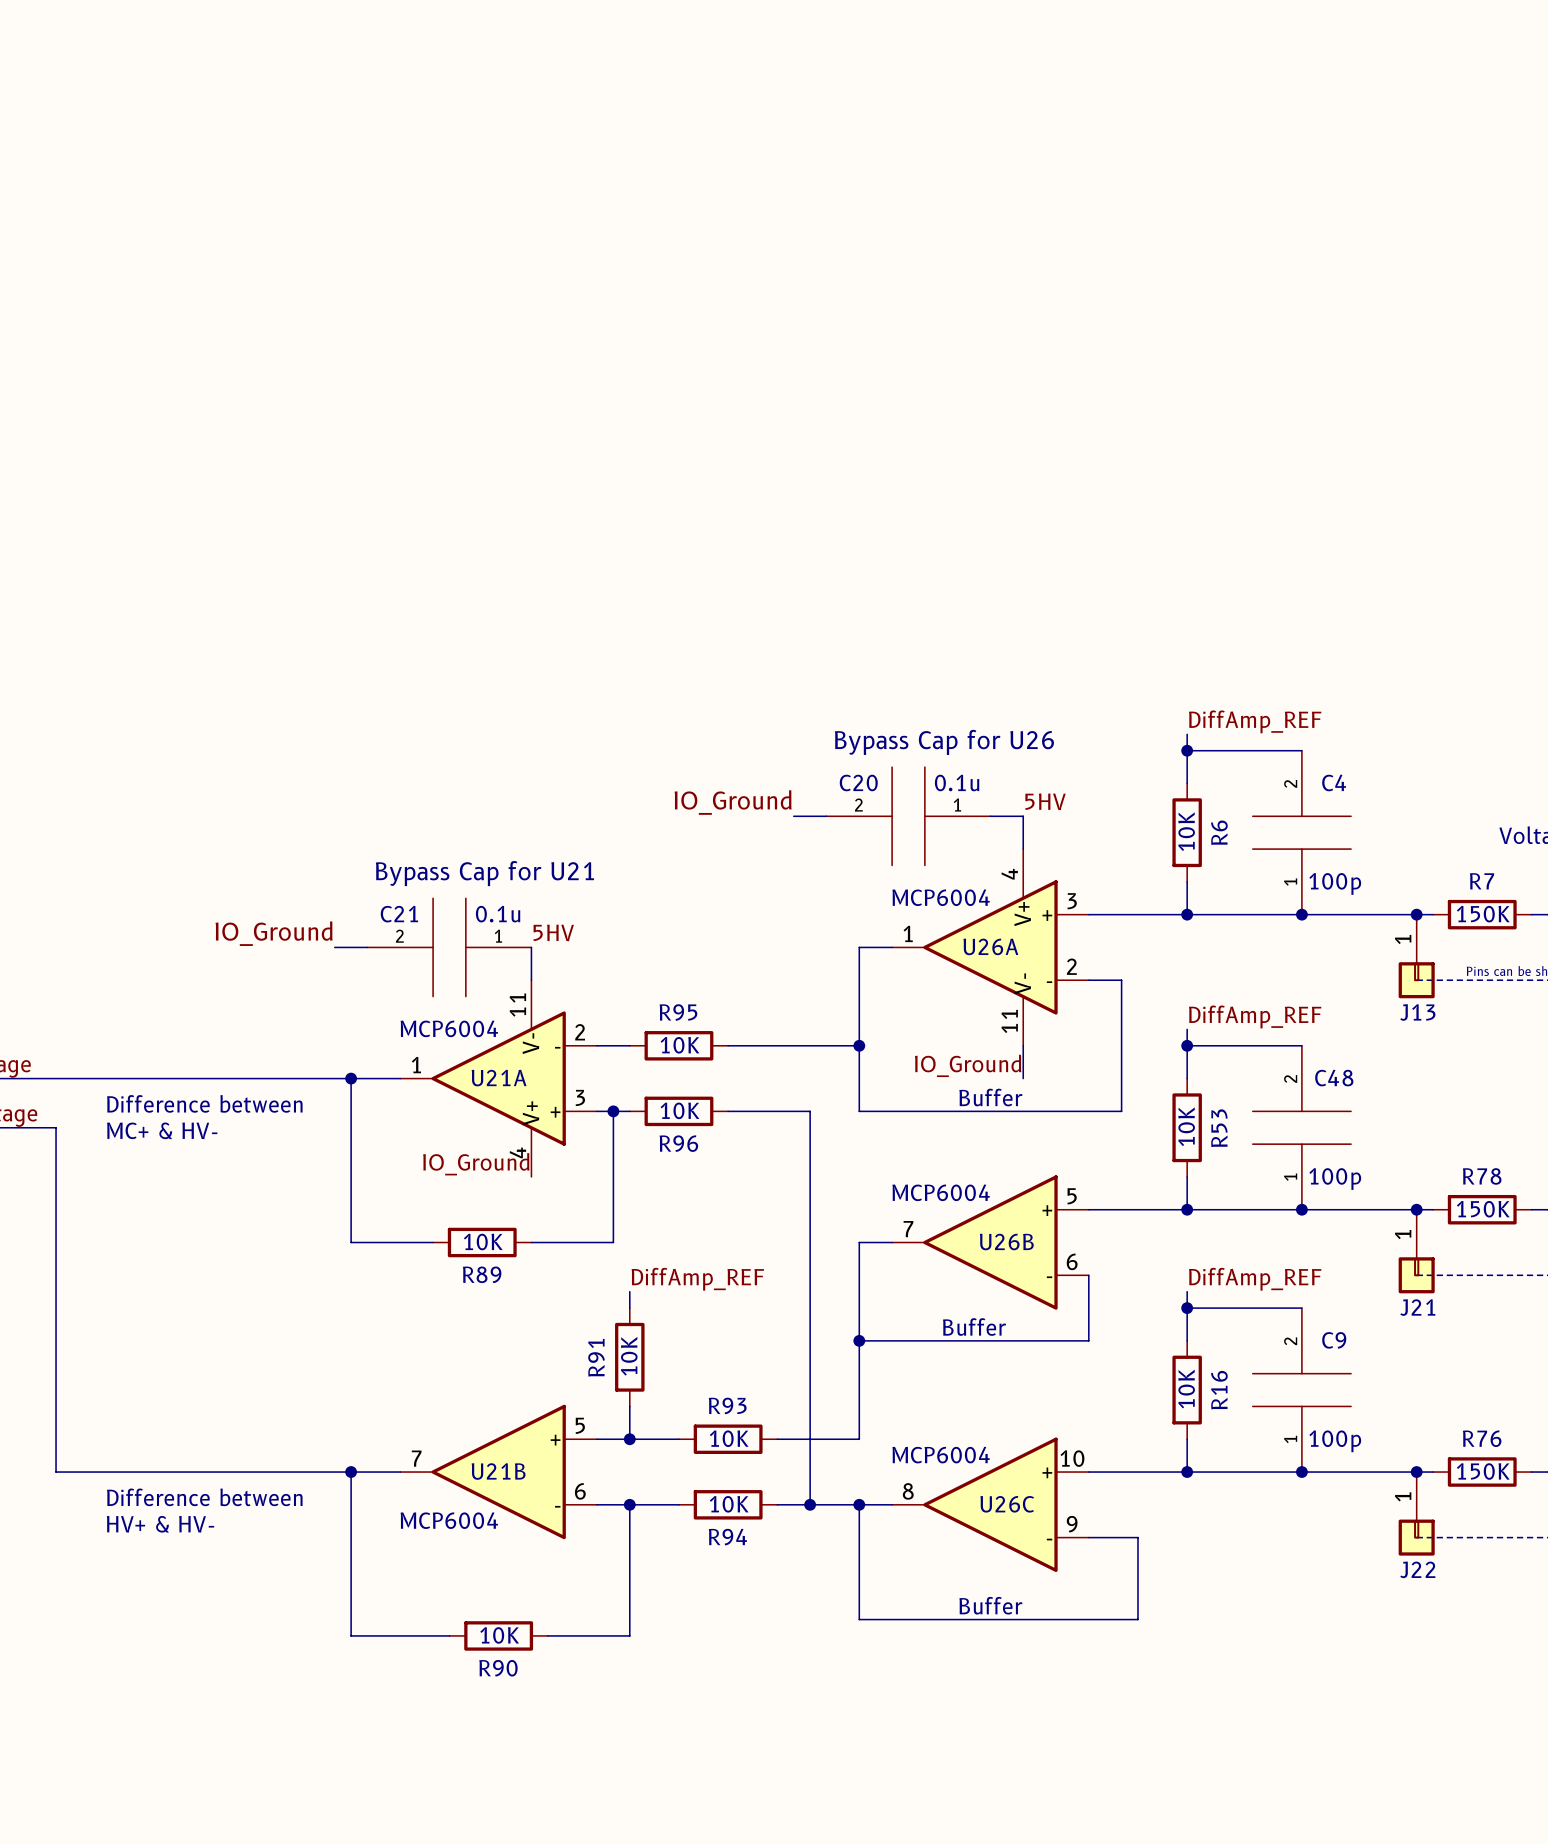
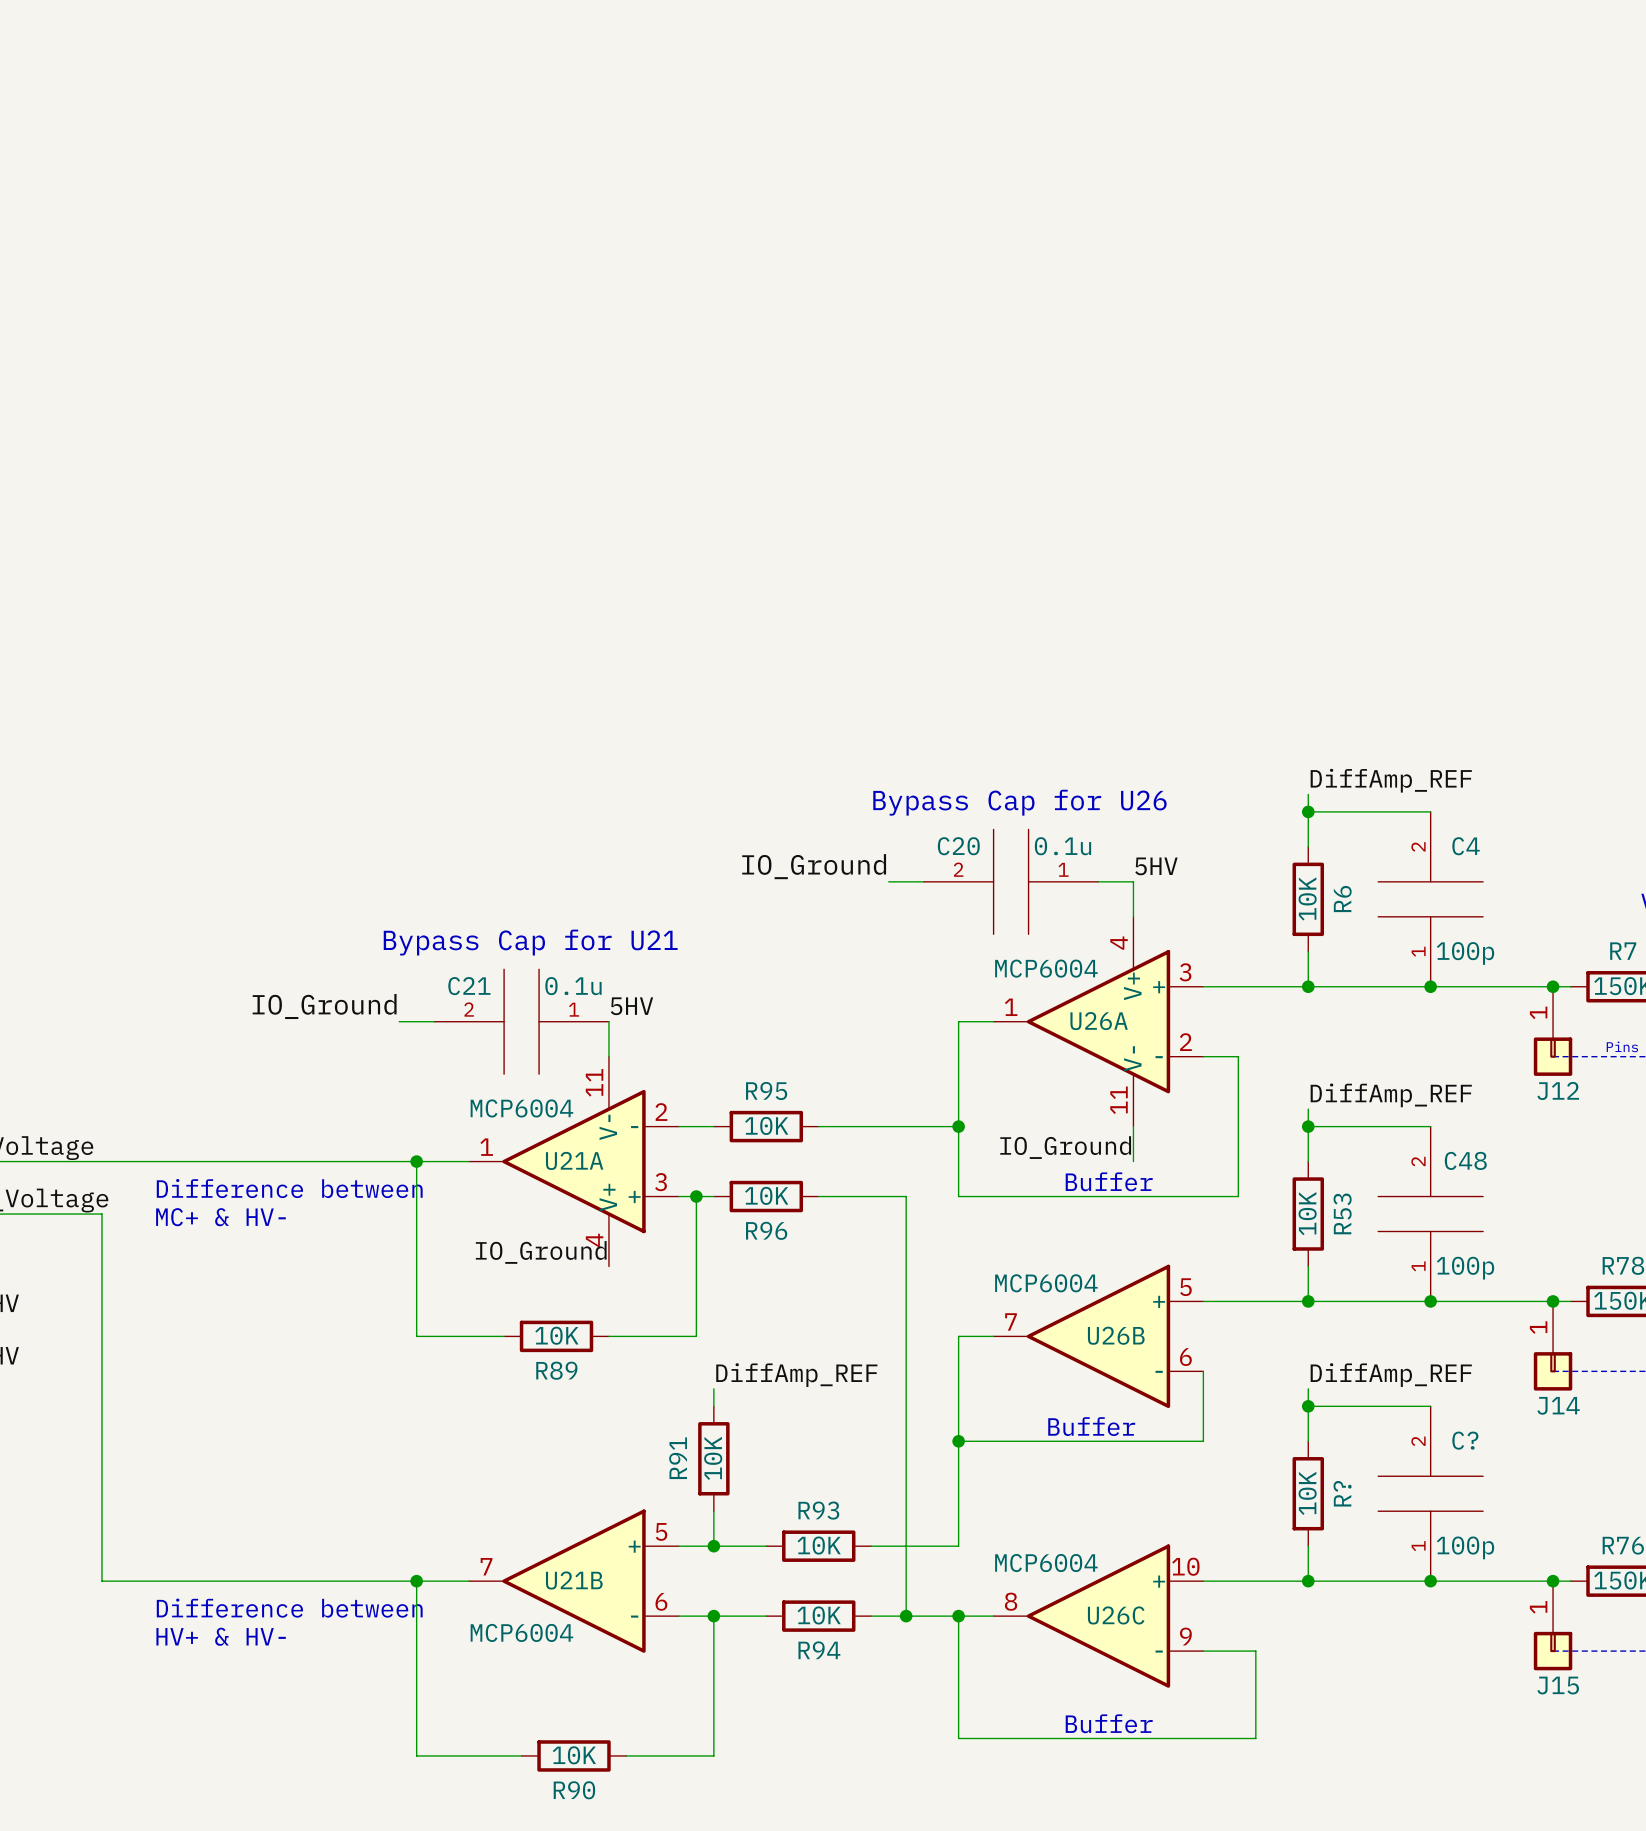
J13 name: J13 (1417, 1012) -> J12 (1558, 1090)
J21 name: J21 (1417, 1307) -> J14 (1558, 1405)
C9 name: C9 (1334, 1340) -> C? (1465, 1440)
R16 name: R16 (1219, 1390) -> R? (1342, 1493)
J22 name: J22 (1417, 1569) -> J15 (1558, 1685)

